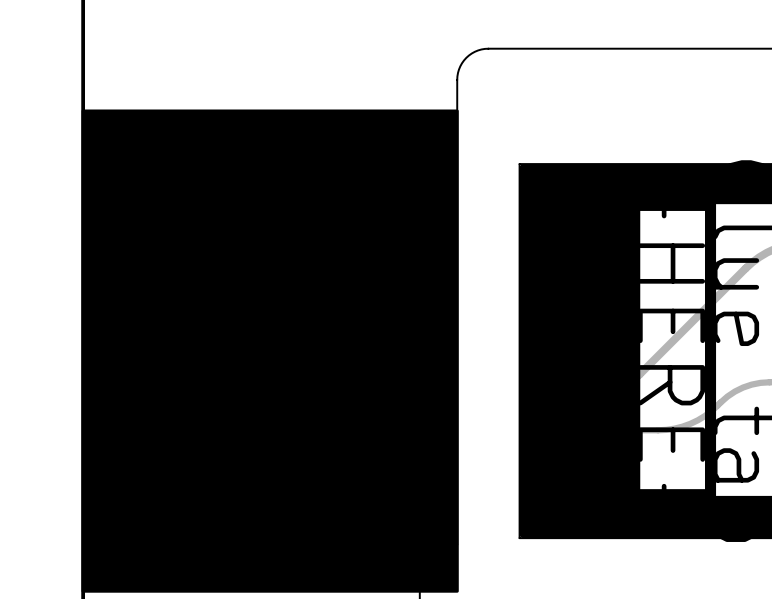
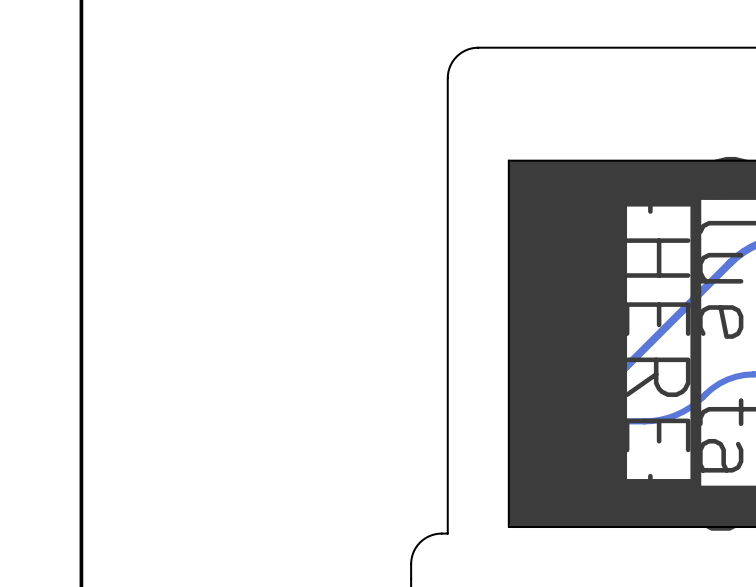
drawing: [81, 109, 459, 593] -> none

